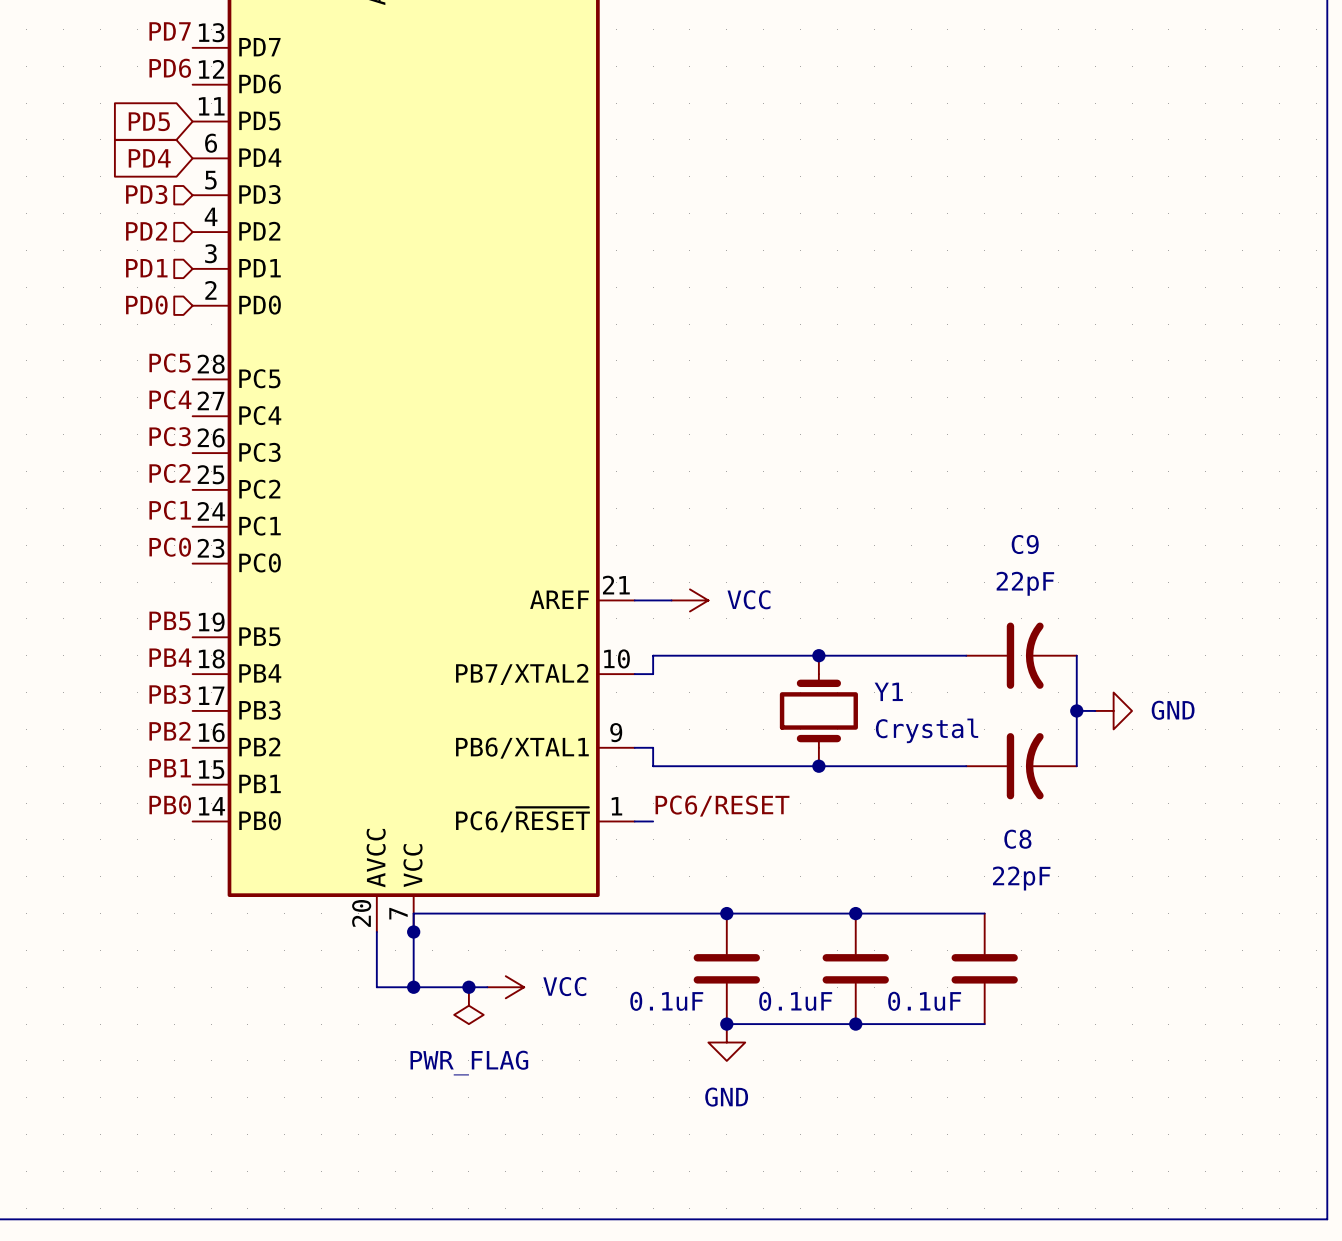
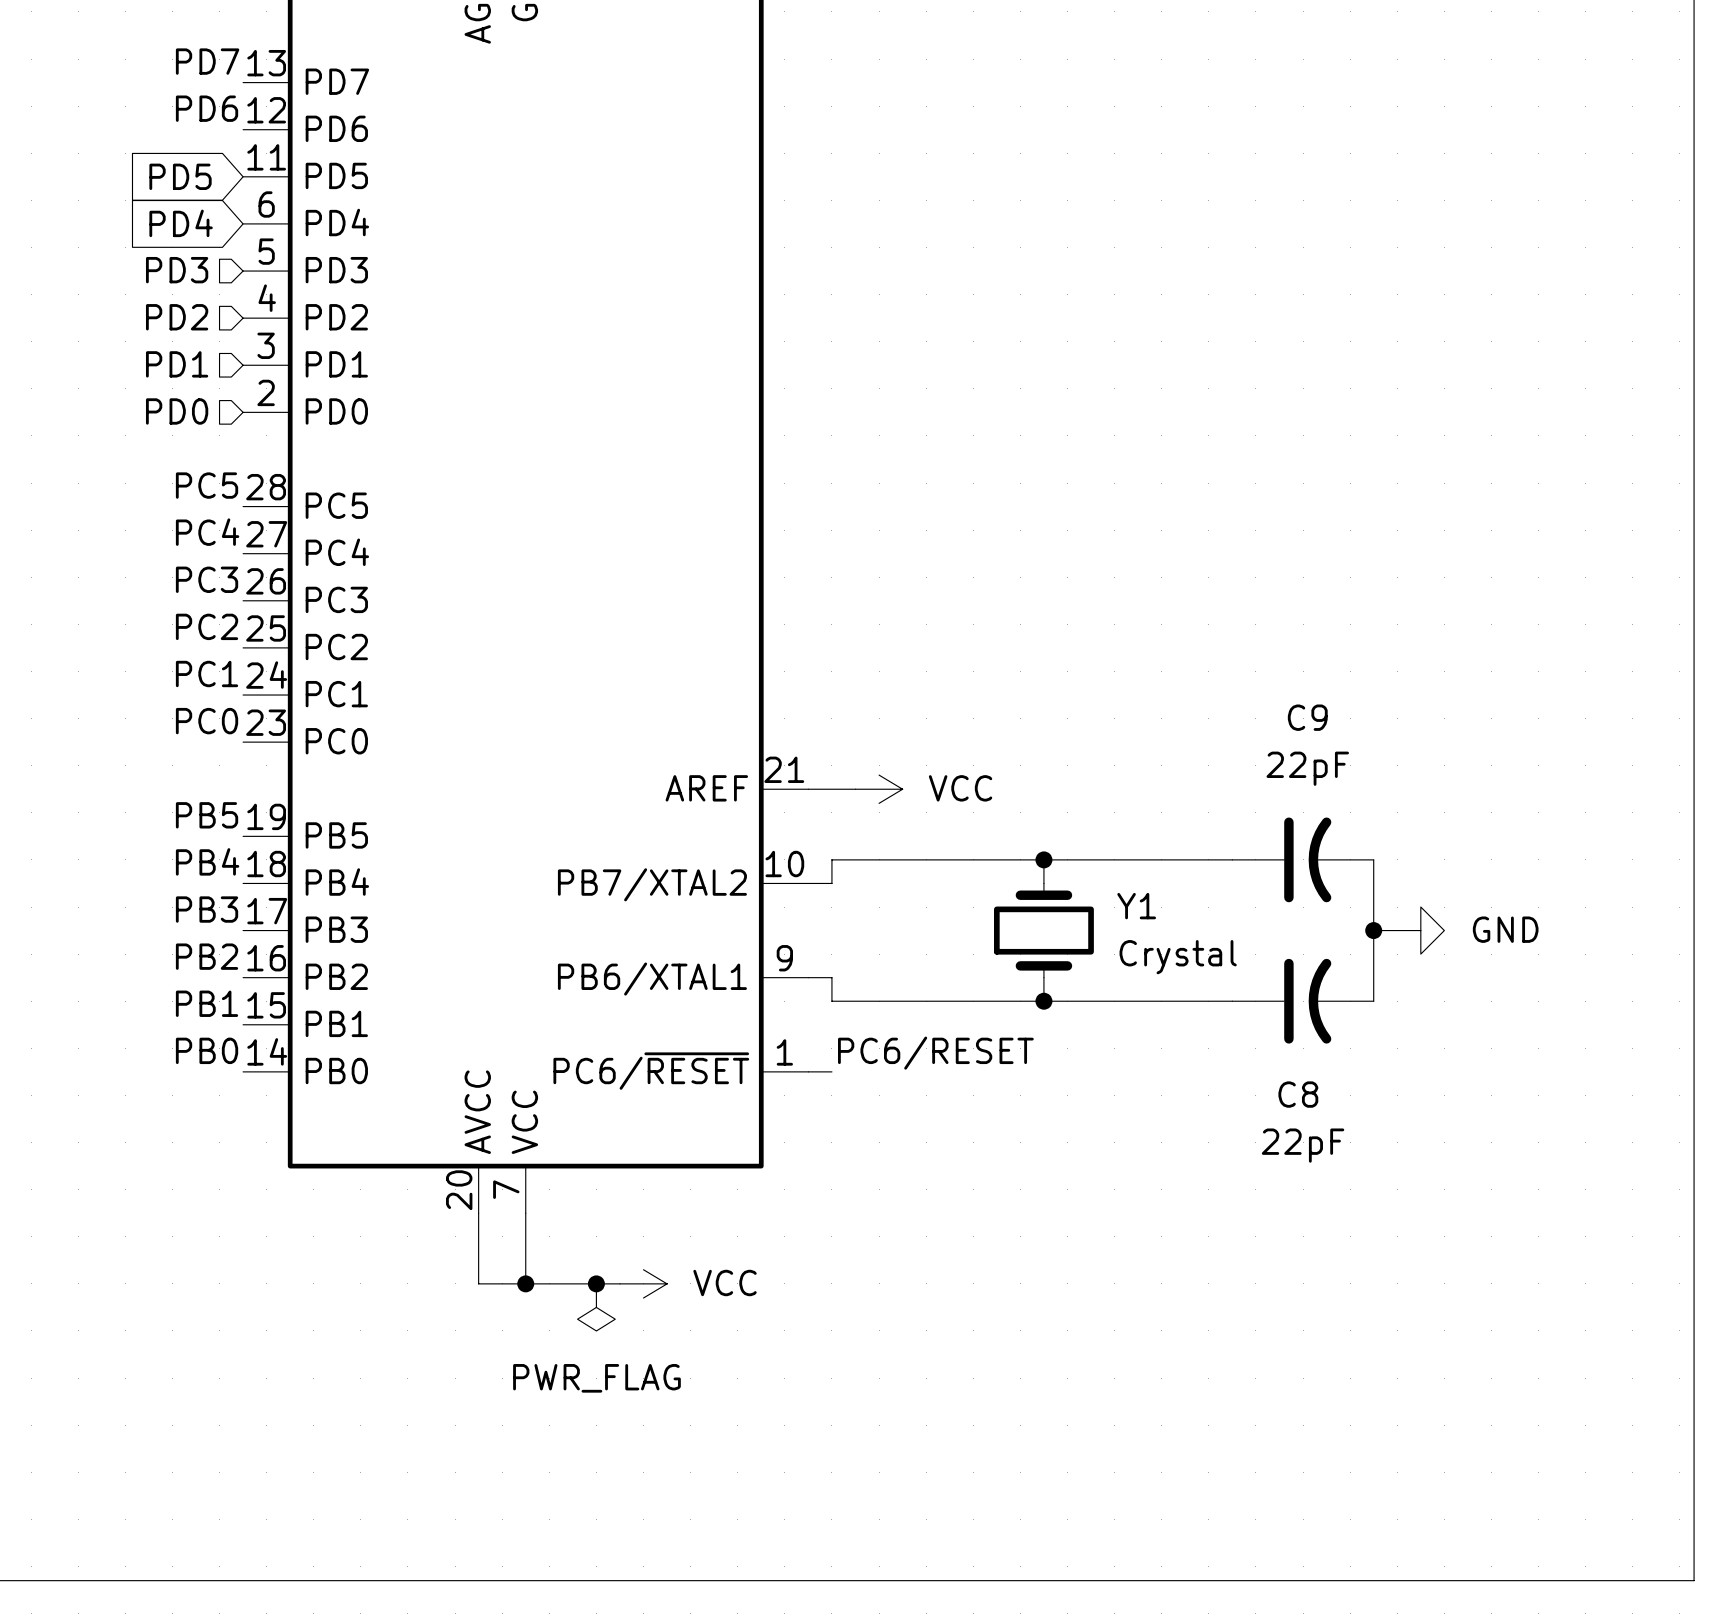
junction: (726, 913) -> none
junction: (855, 913) -> none
wire: (984, 913) (413, 913) (413, 931) -> none
junction: (413, 931) -> none
part: 0.1uF (726, 968) -> none
part: 0.1uF (855, 968) -> none
part: 0.1uF (984, 968) -> none
wire: (726, 1024) (984, 1024) -> none
junction: (726, 1024) -> none
junction: (855, 1024) -> none
power symbol: GND (726, 1042) -> none

